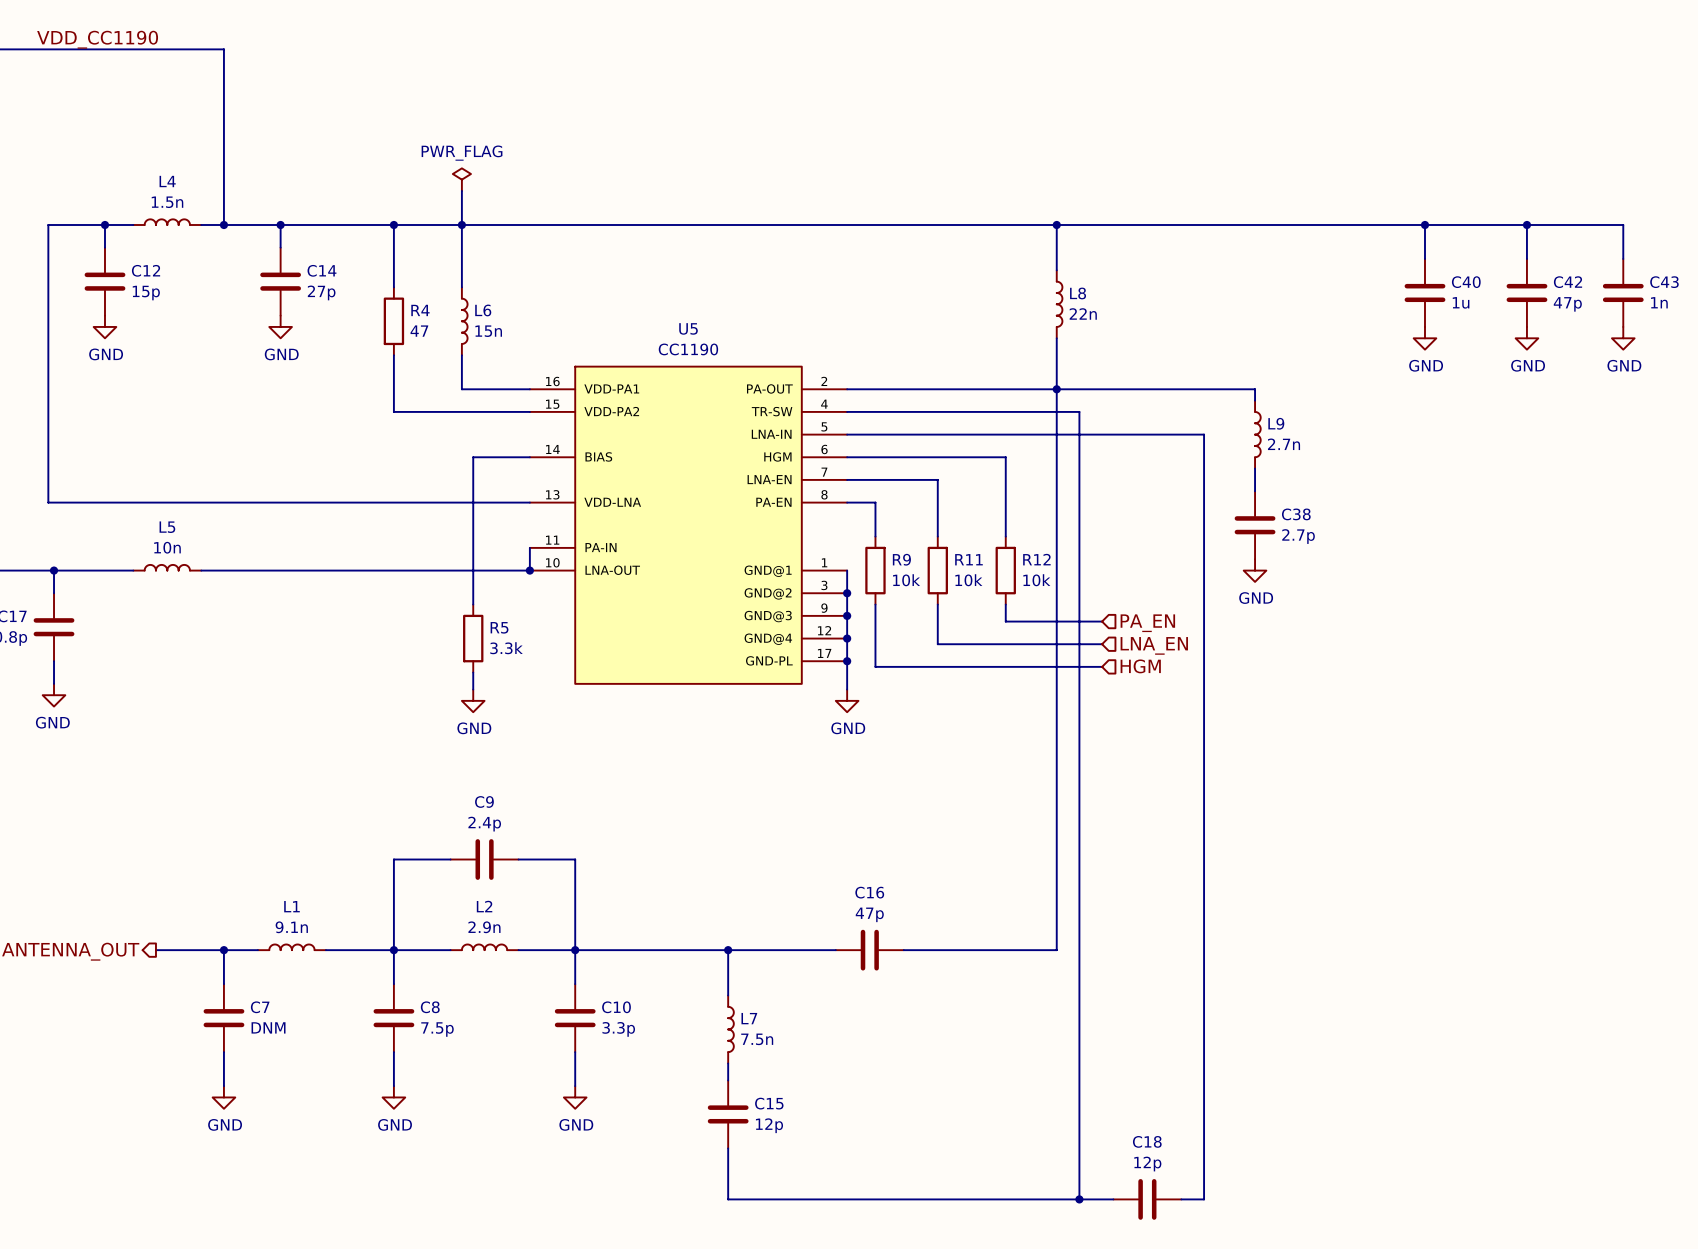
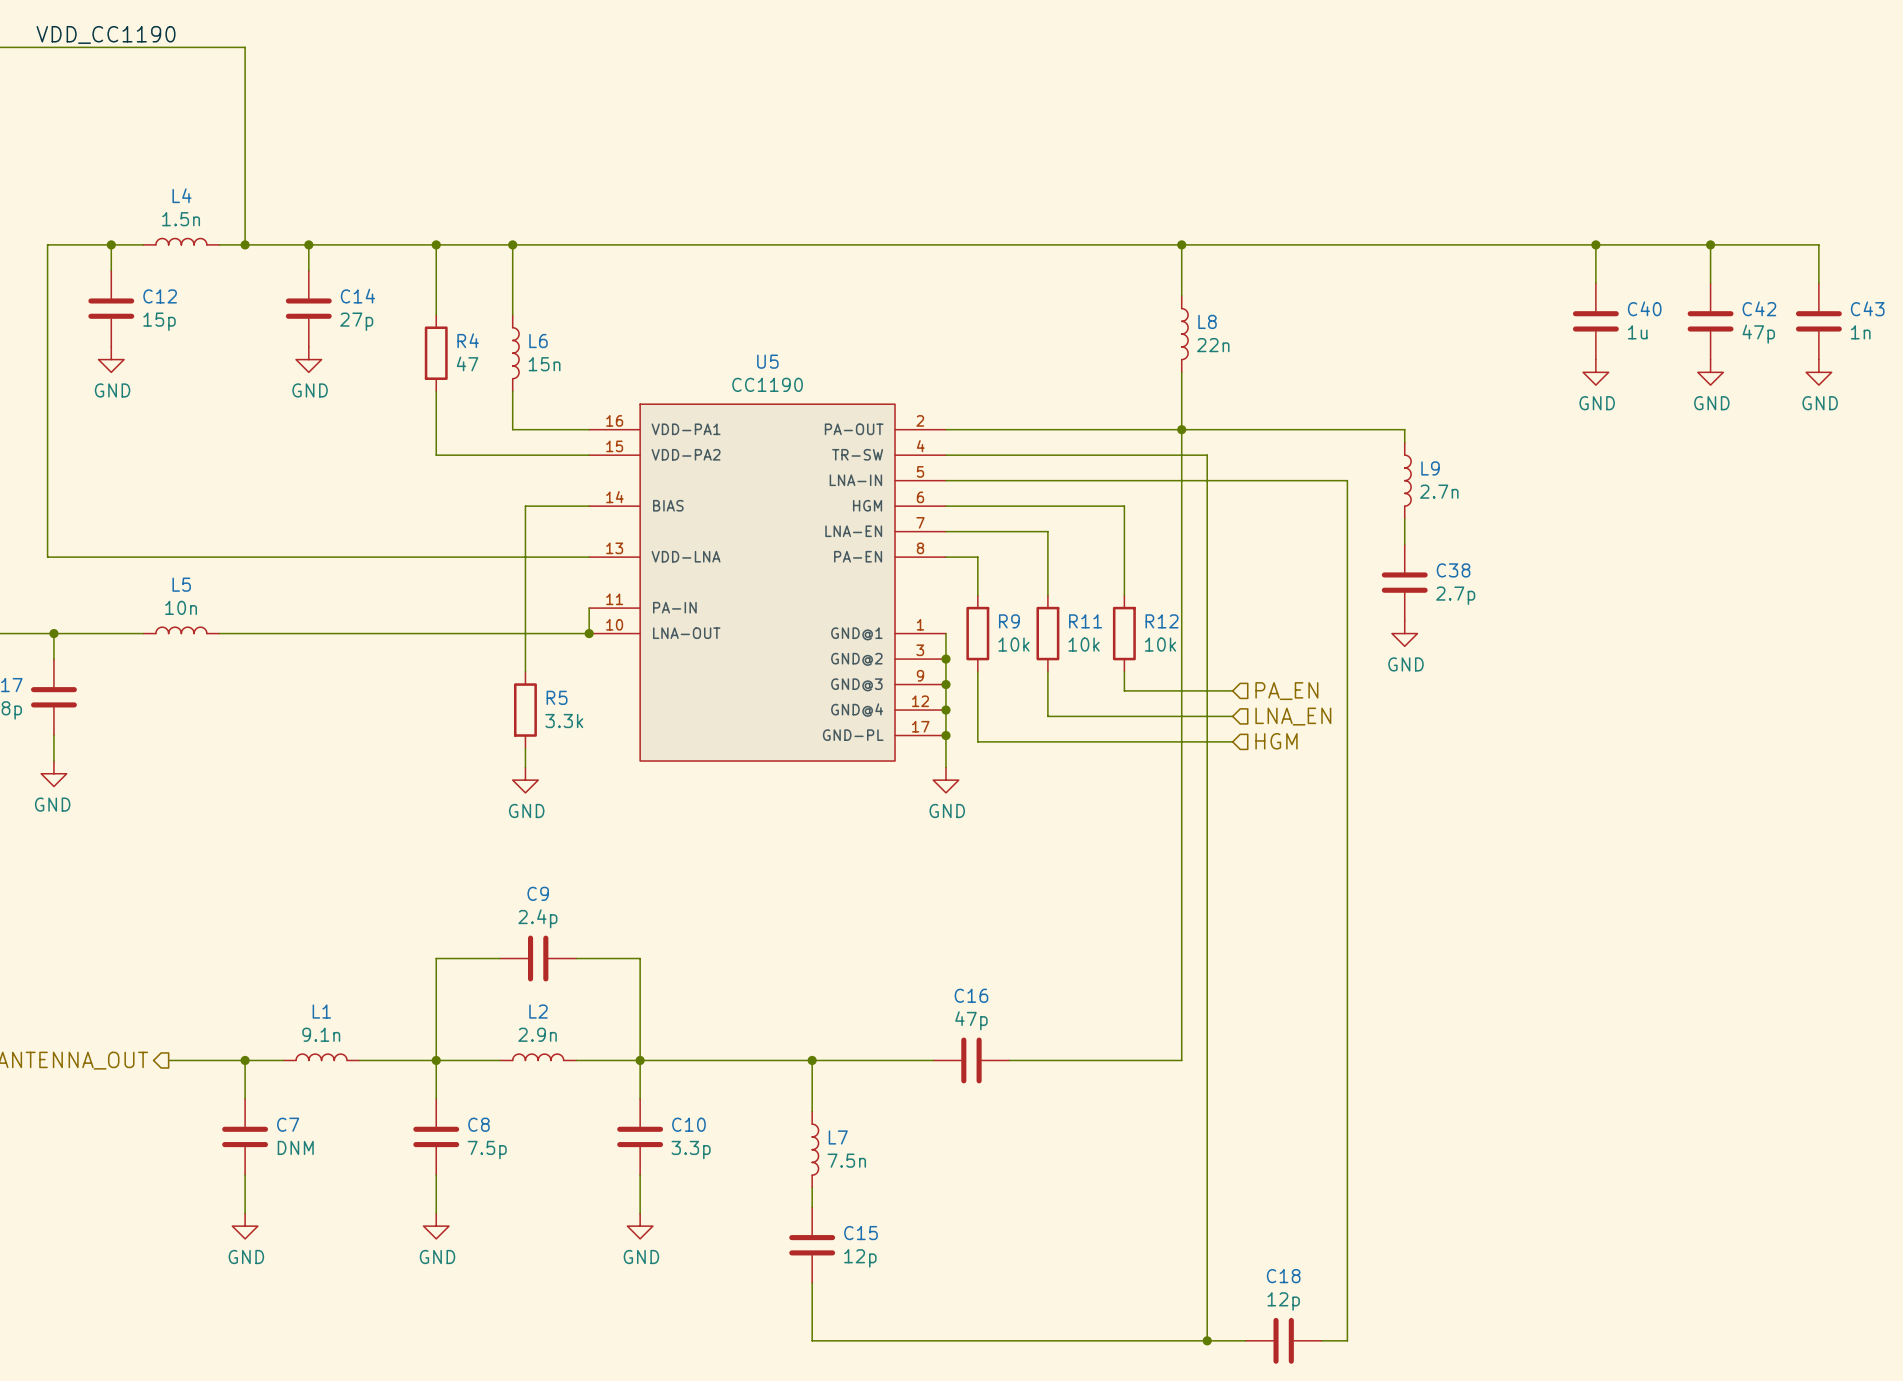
power symbol: PWR_FLAG (461, 179) -> none
wire: (461, 191) (461, 225) -> none

